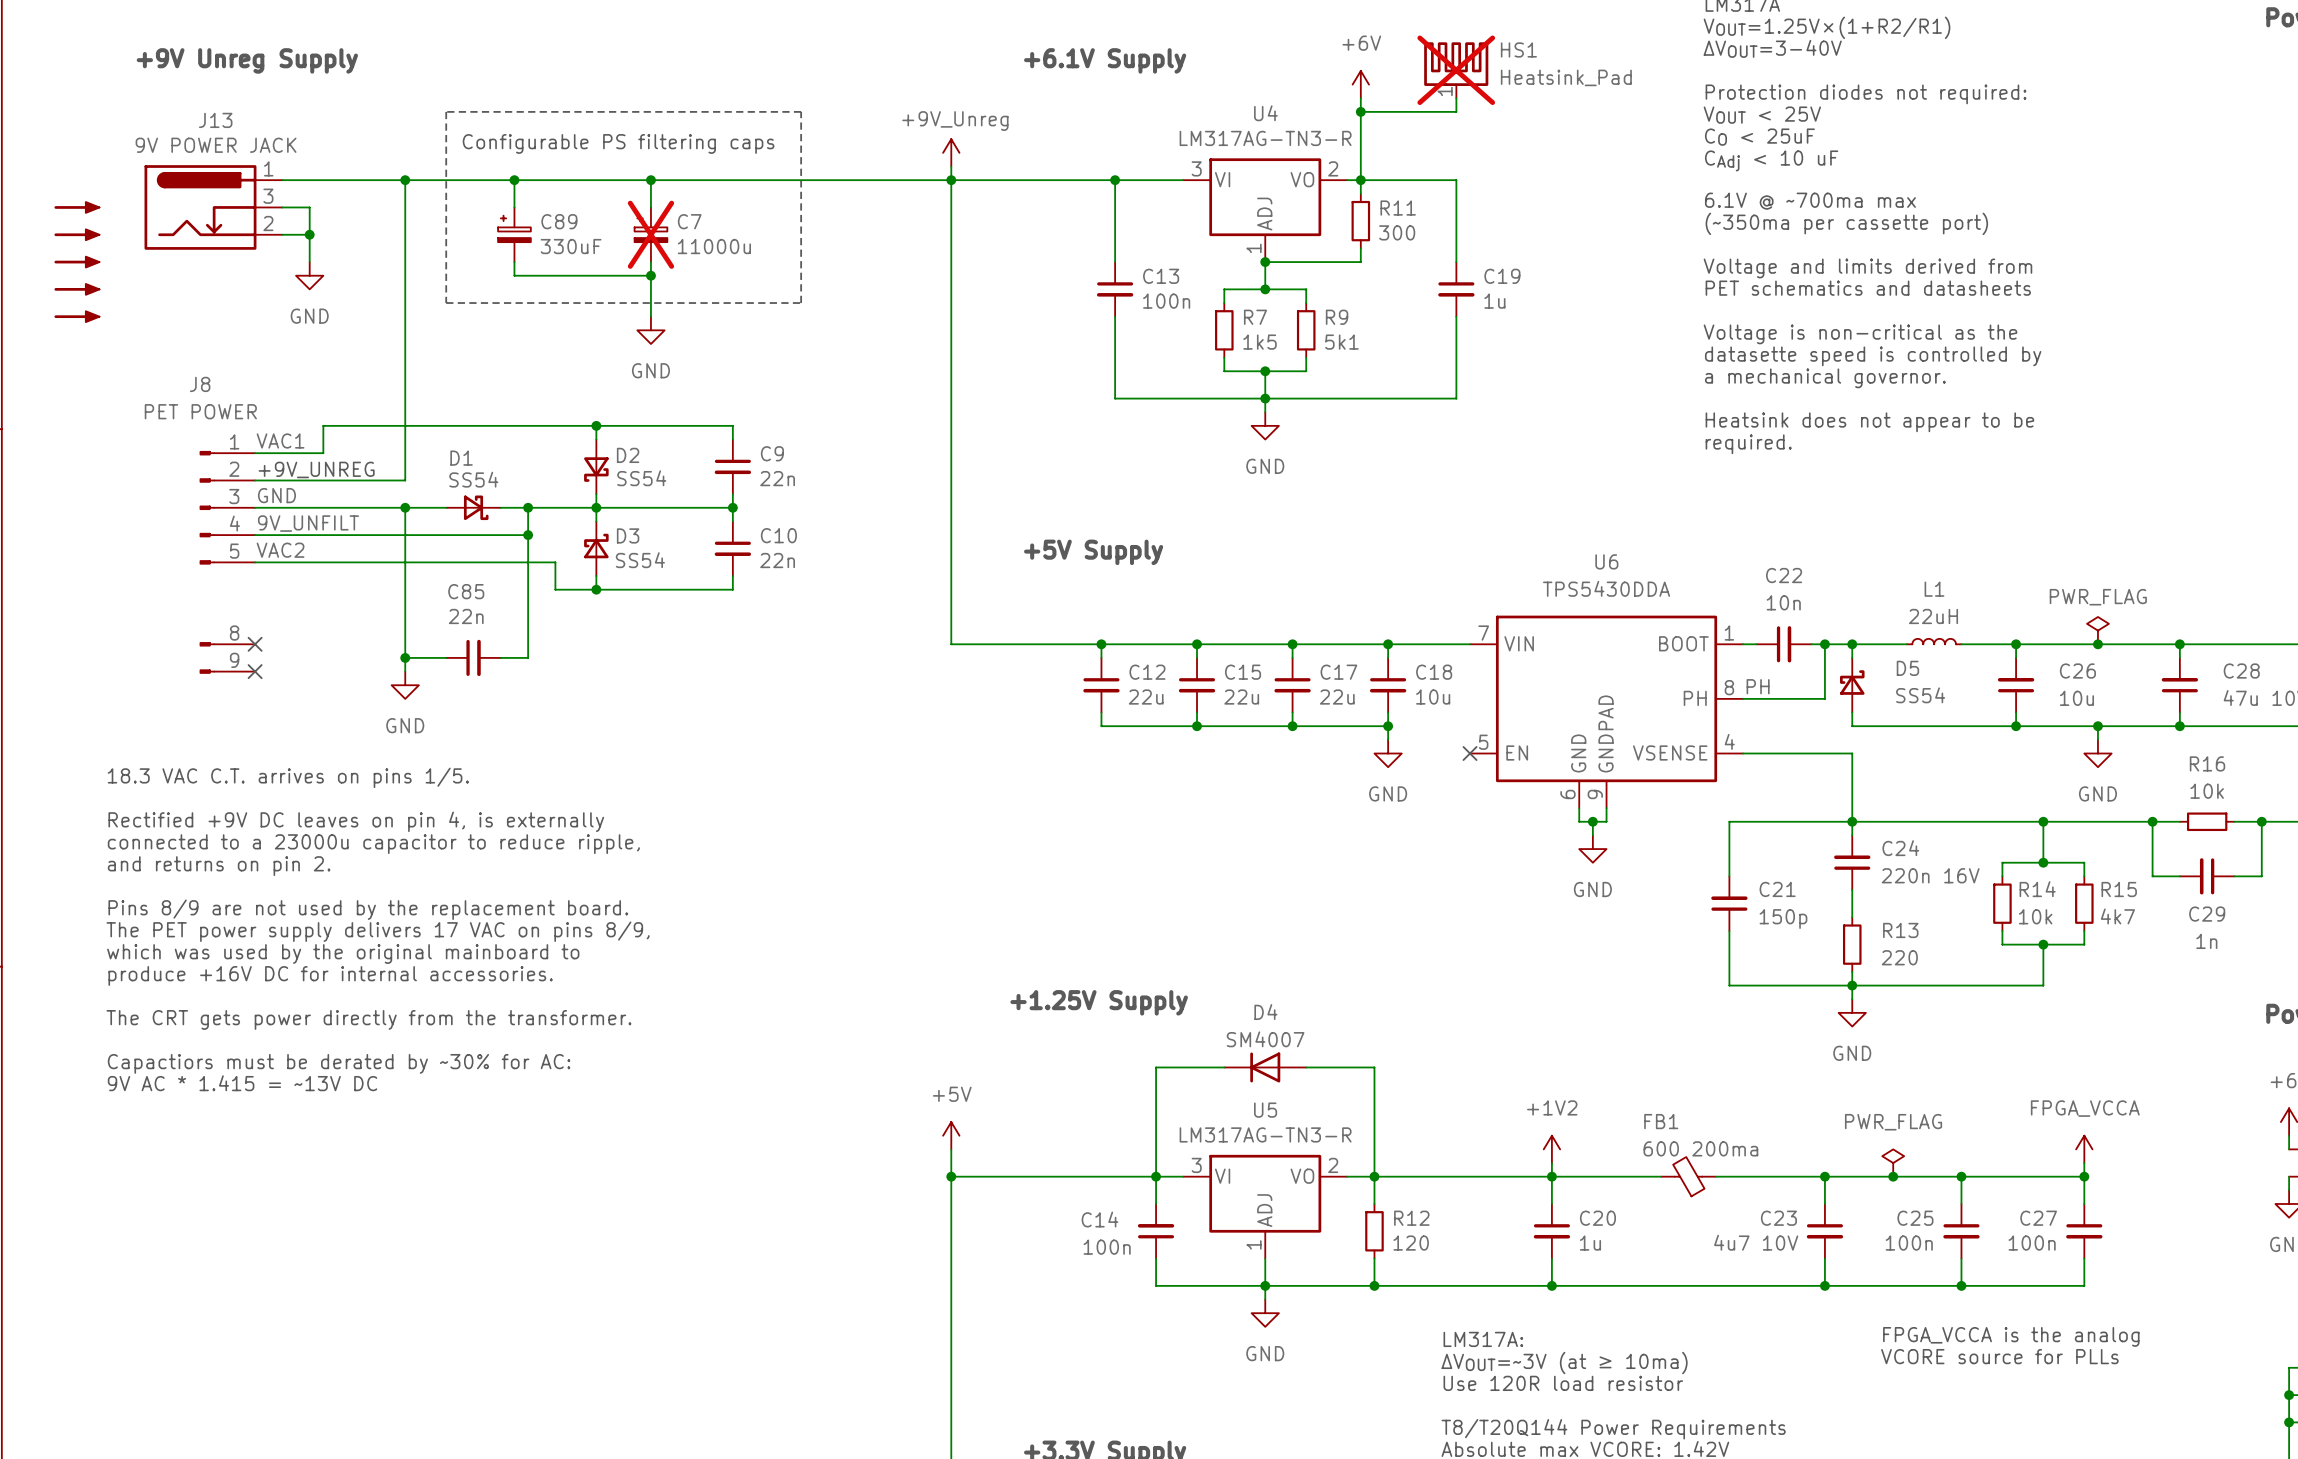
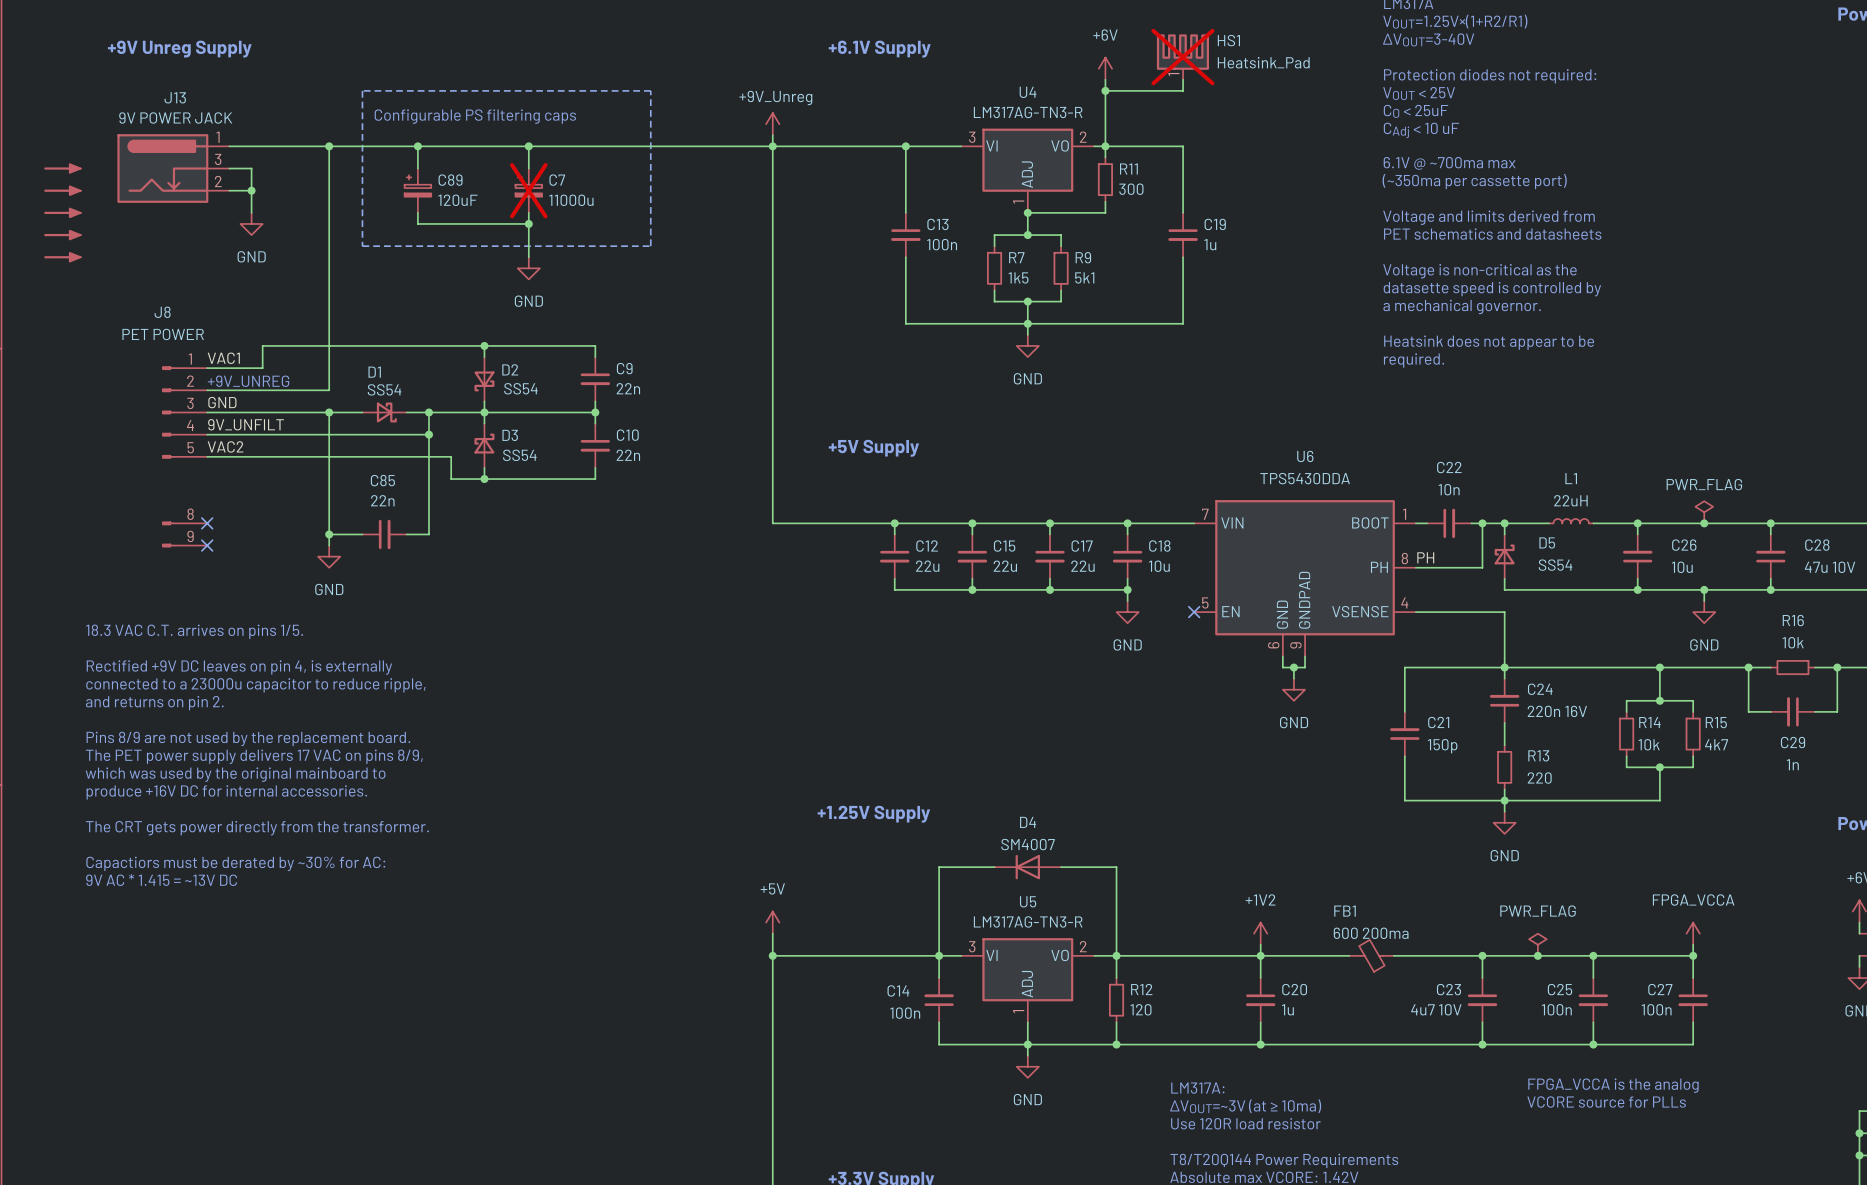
C89 value: 330uF (571, 246) -> 120uF (457, 200)

